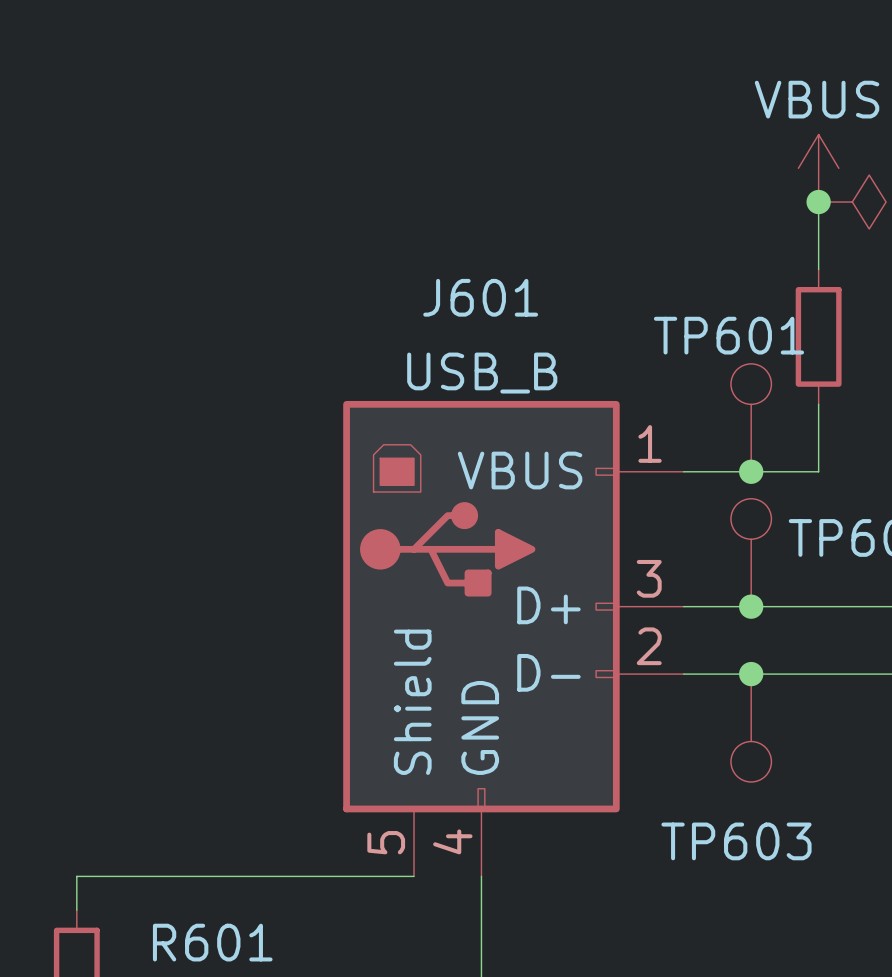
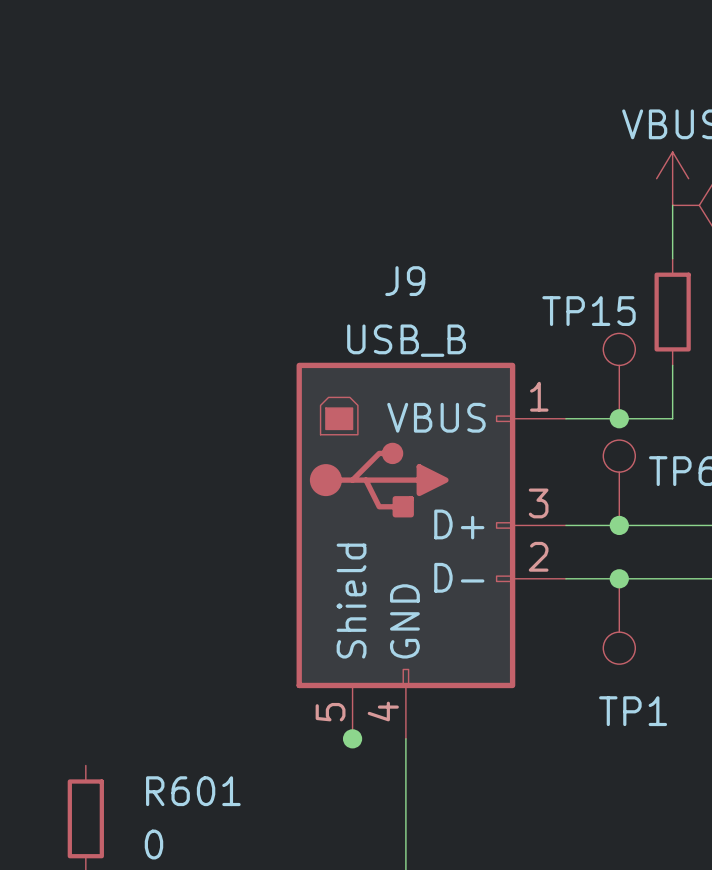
junction: (818, 202) -> none
J601 name: J601 (480, 297) -> J9 (405, 281)
TP601 name: TP601 (728, 335) -> TP15 (589, 311)
TP603 name: TP603 (736, 841) -> TP1 (633, 711)
wire: (414, 876) (76, 876) (76, 910) -> none
junction: none -> (352, 738)

